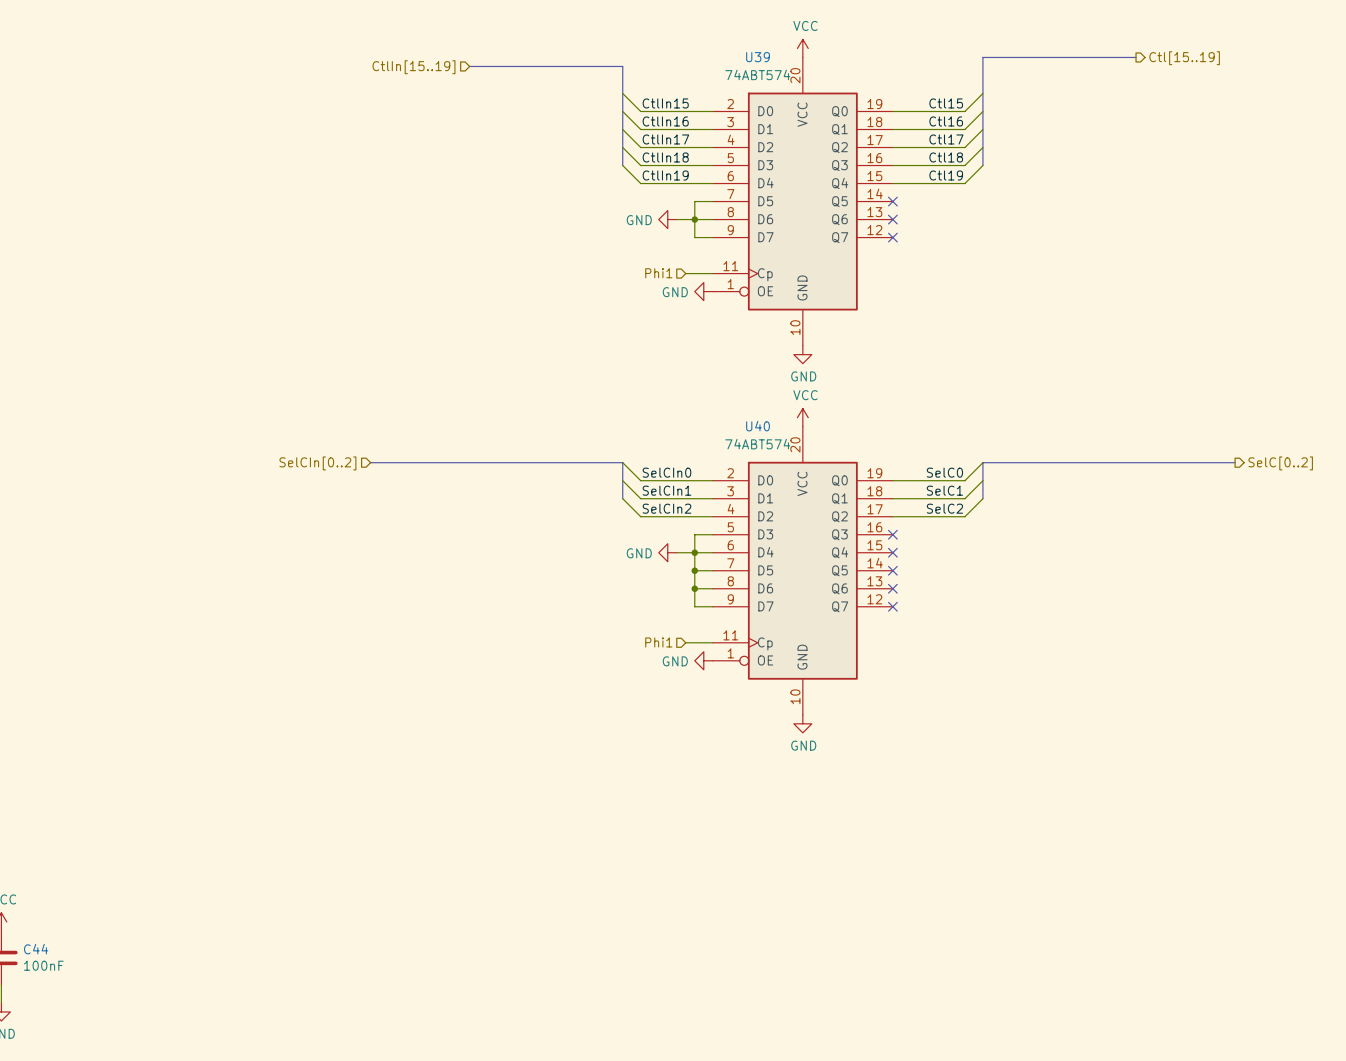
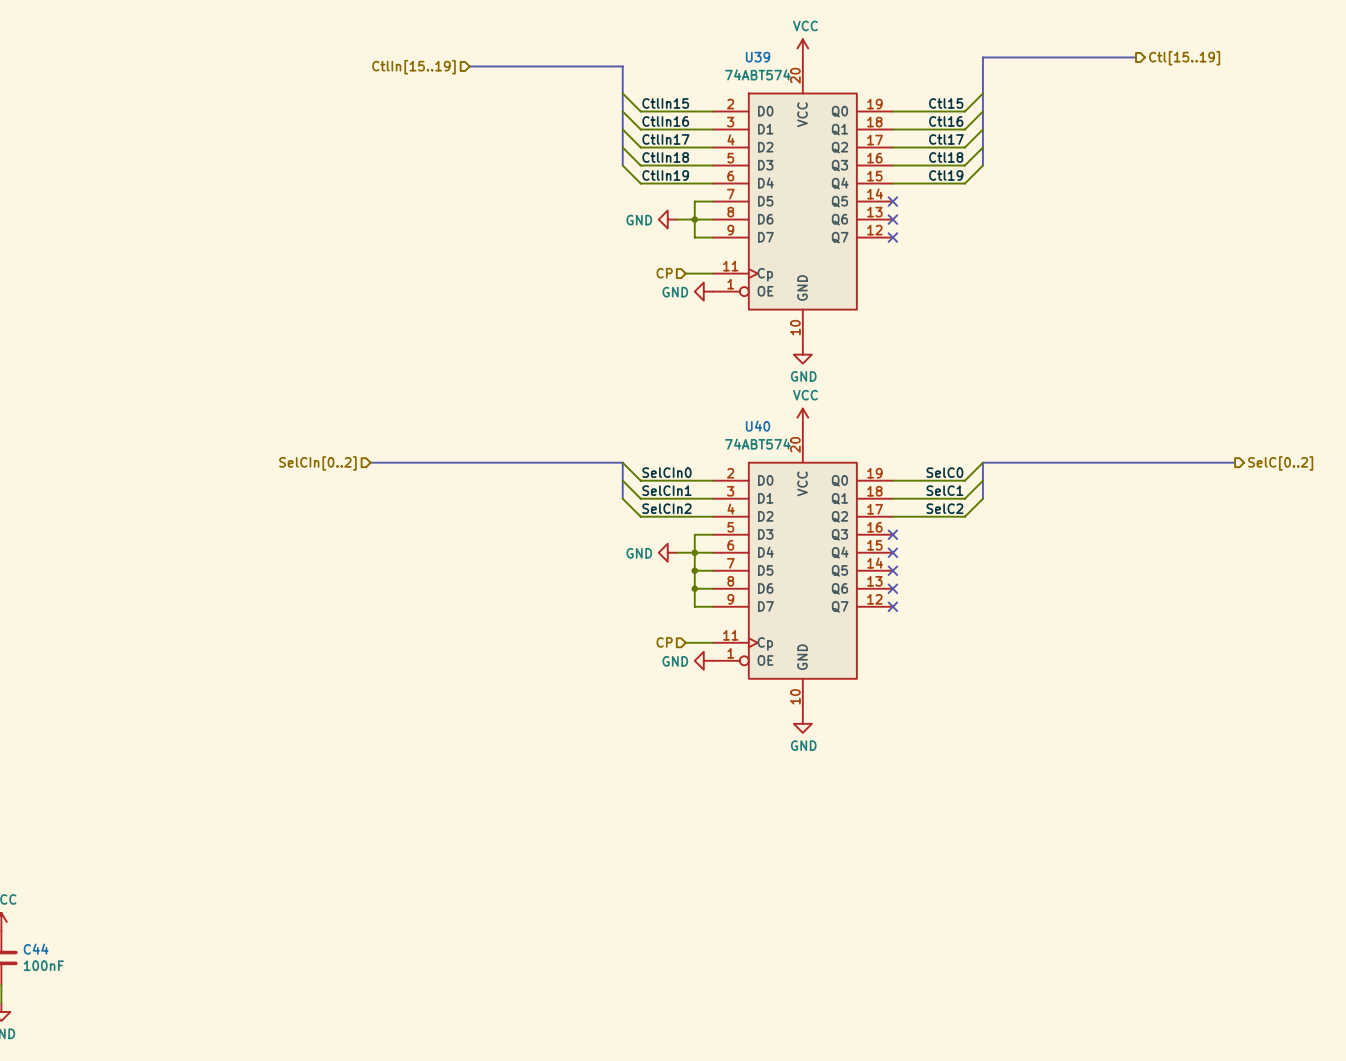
hierarchical label: Phi1 (658, 273) -> CP (664, 273)
hierarchical label: Phi1 (658, 642) -> CP (664, 642)

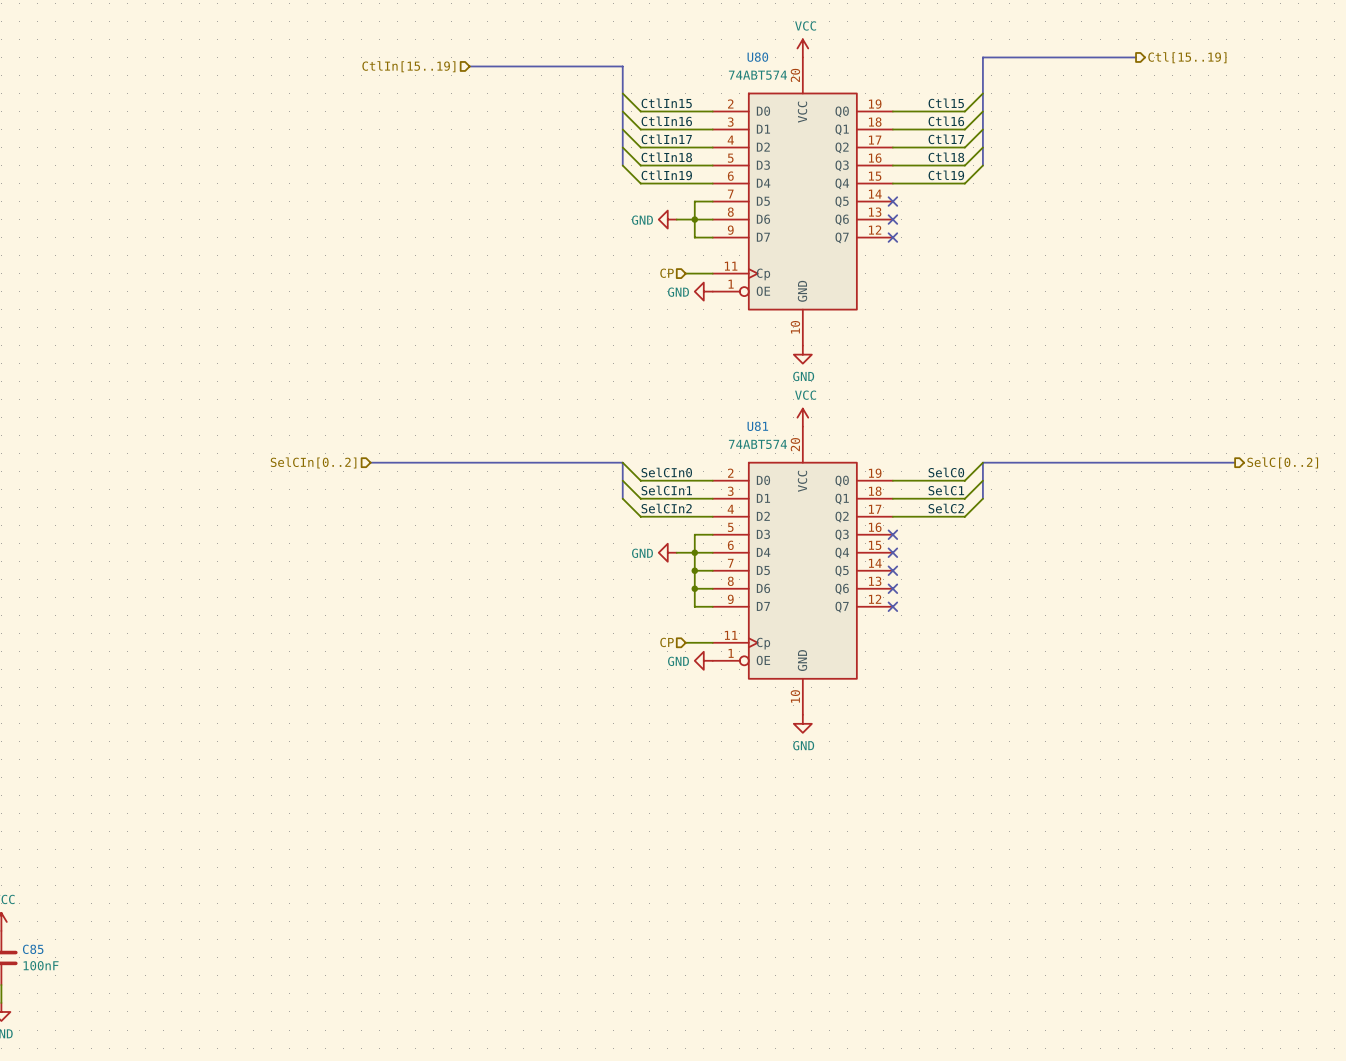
U39 name: U39 (758, 57) -> U80 (757, 57)
U40 name: U40 (758, 426) -> U81 (757, 426)
C44 name: C44 (36, 949) -> C85 (33, 949)

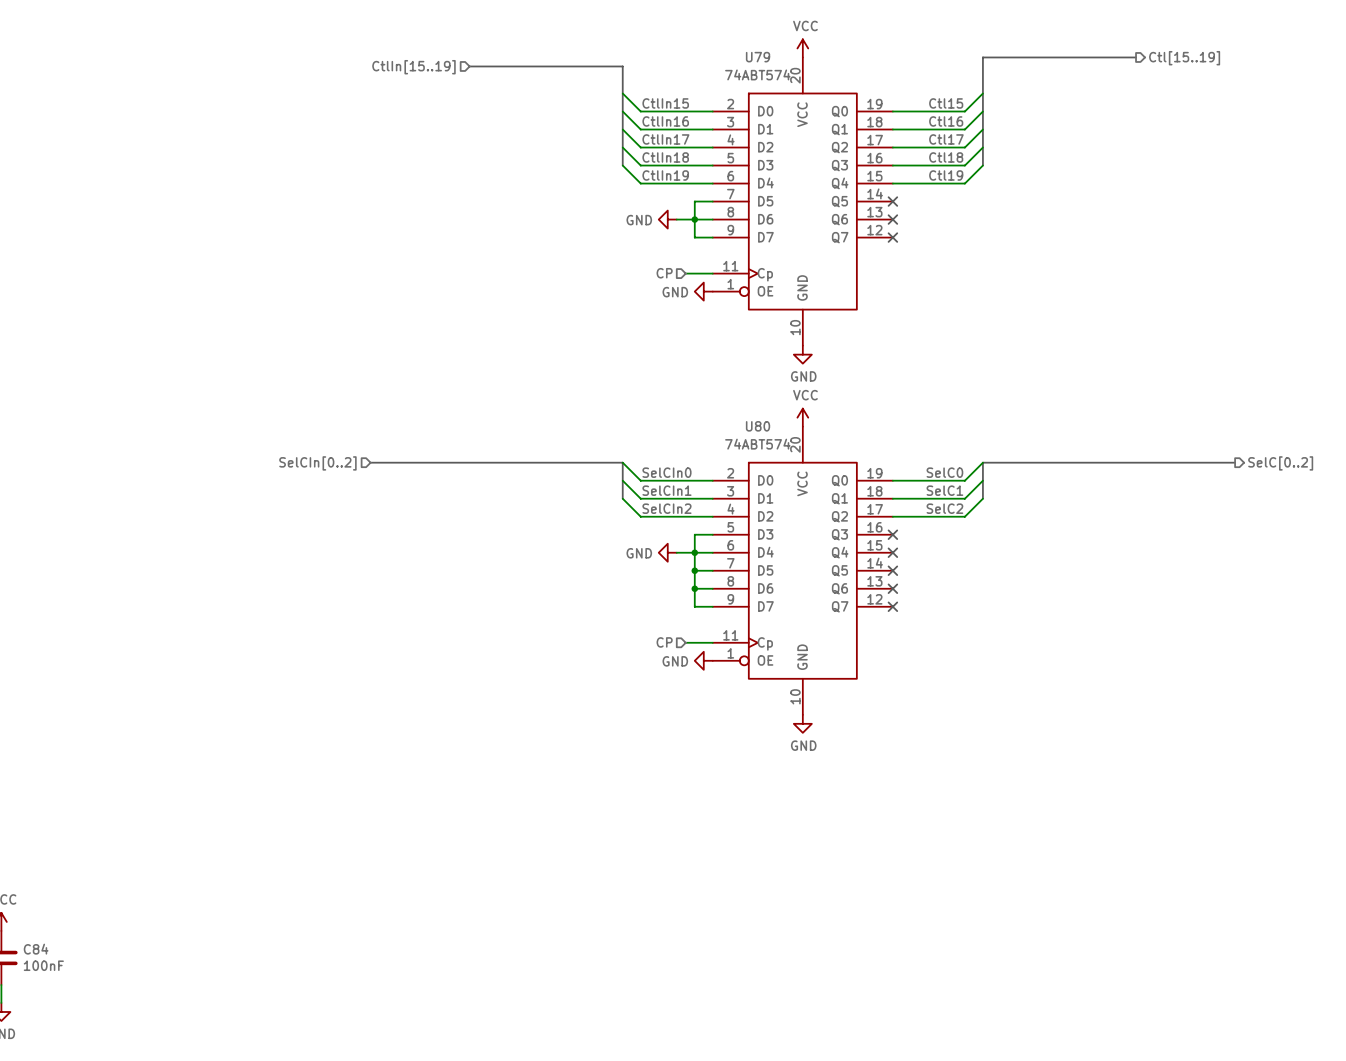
U80 name: U80 (757, 57) -> U79 (758, 57)
U81 name: U81 (757, 426) -> U80 (758, 426)
C85 name: C85 (33, 949) -> C84 (36, 949)

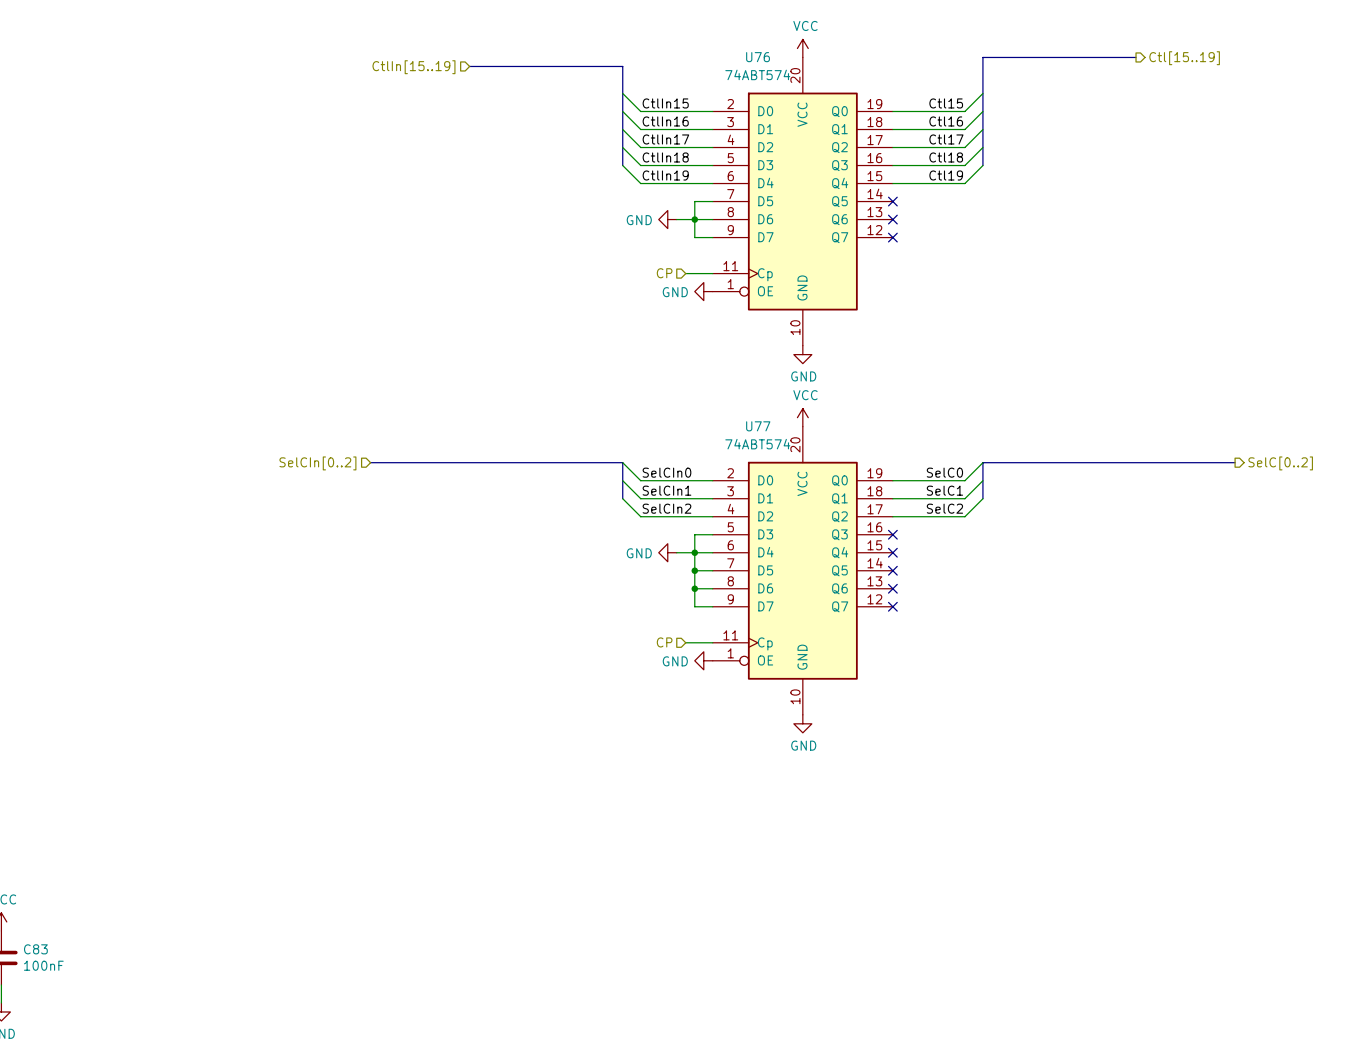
U79 name: U79 (758, 57) -> U76 (758, 57)
U80 name: U80 (758, 426) -> U77 (758, 426)
C84 name: C84 (36, 949) -> C83 (35, 949)

